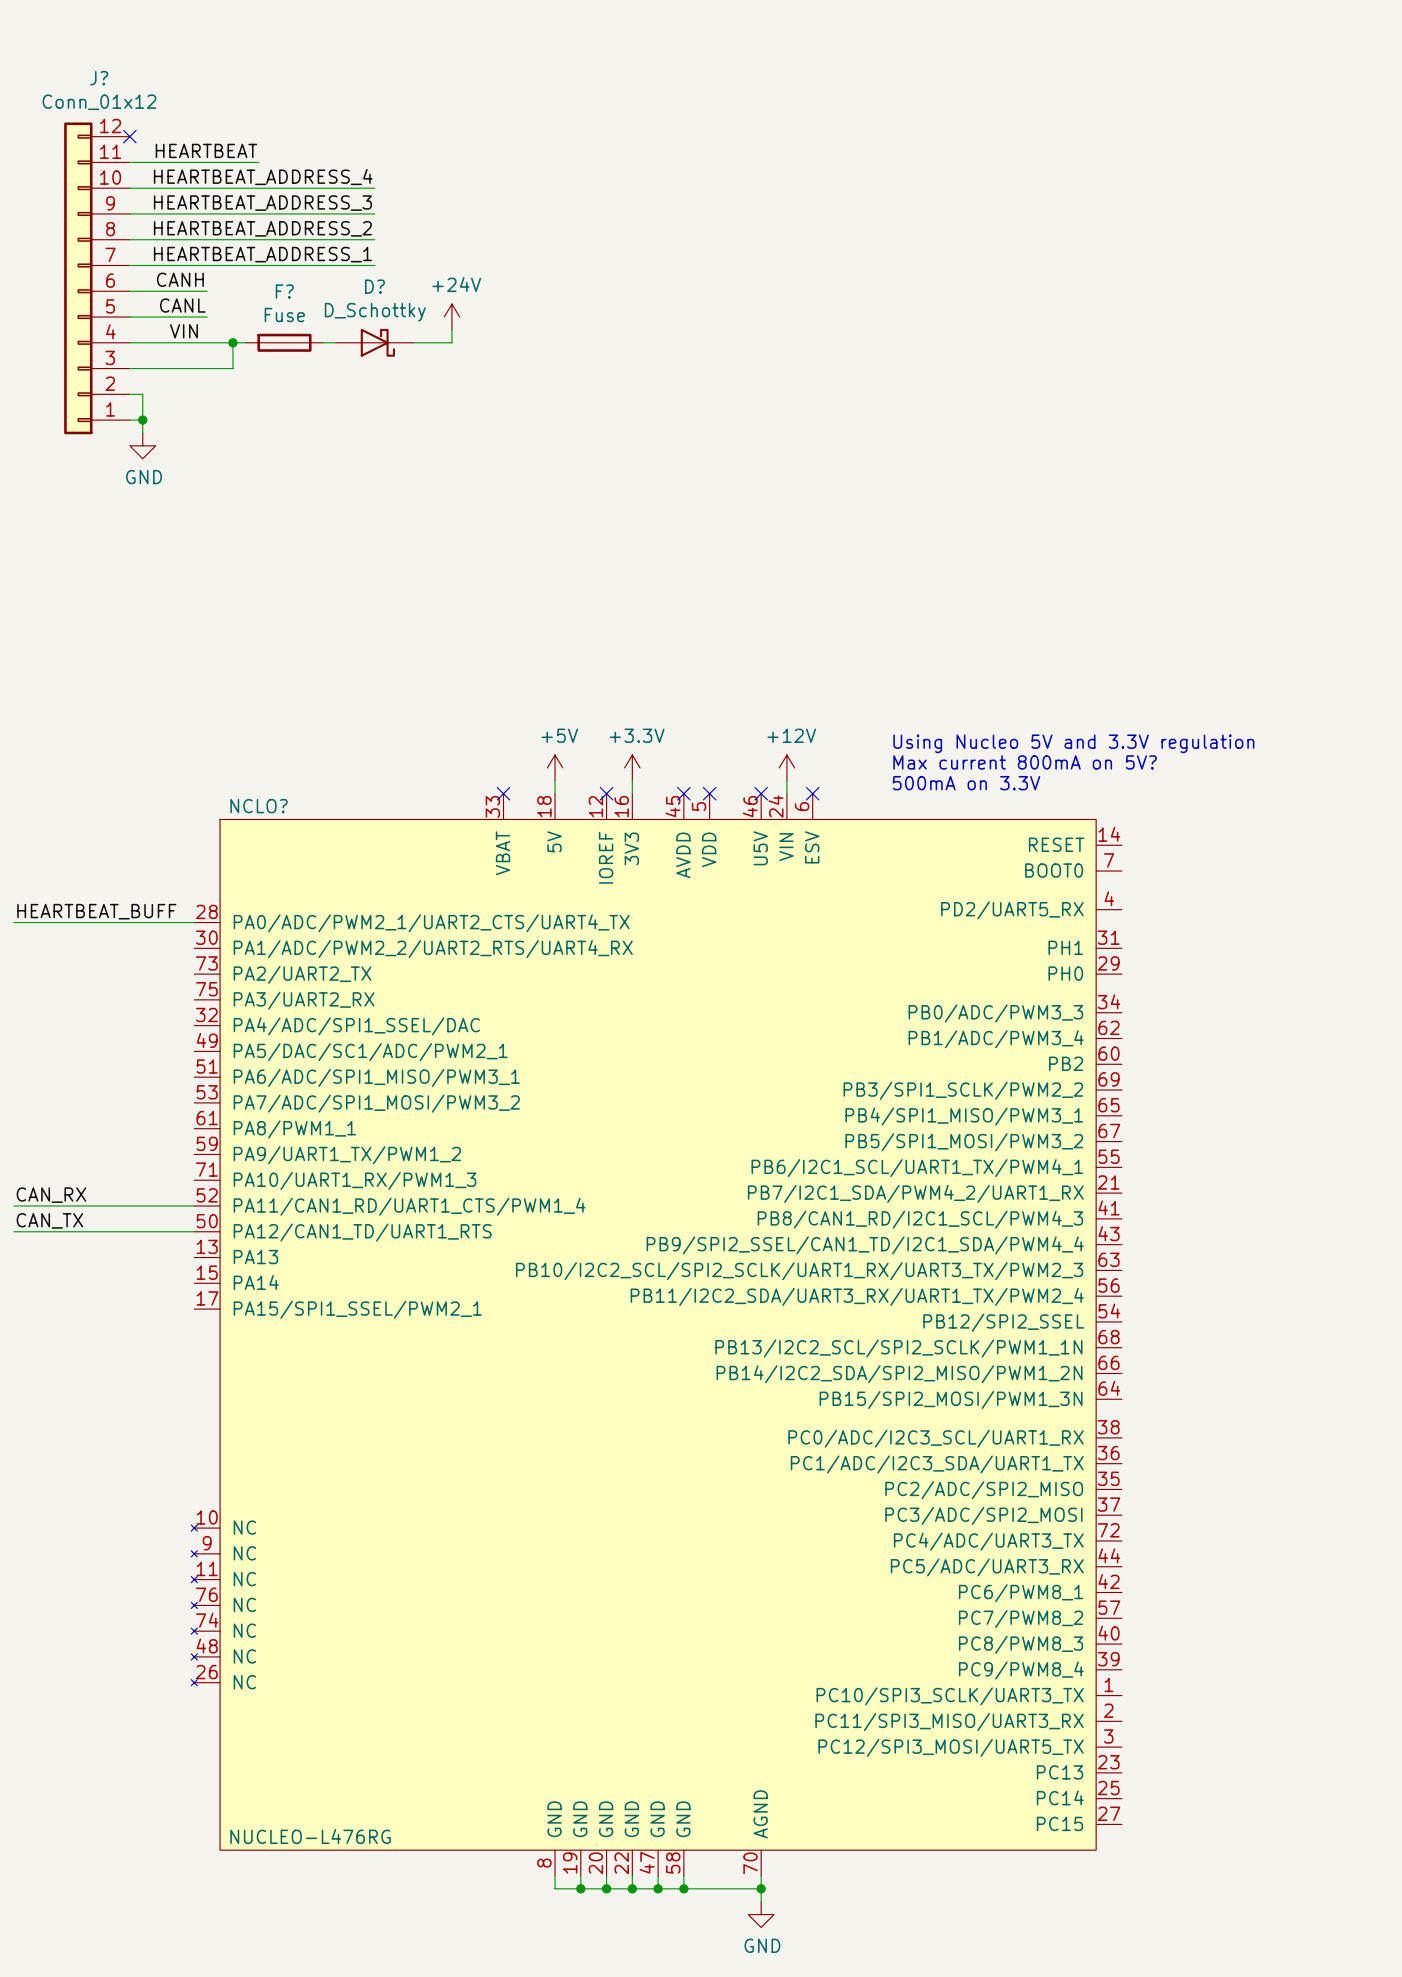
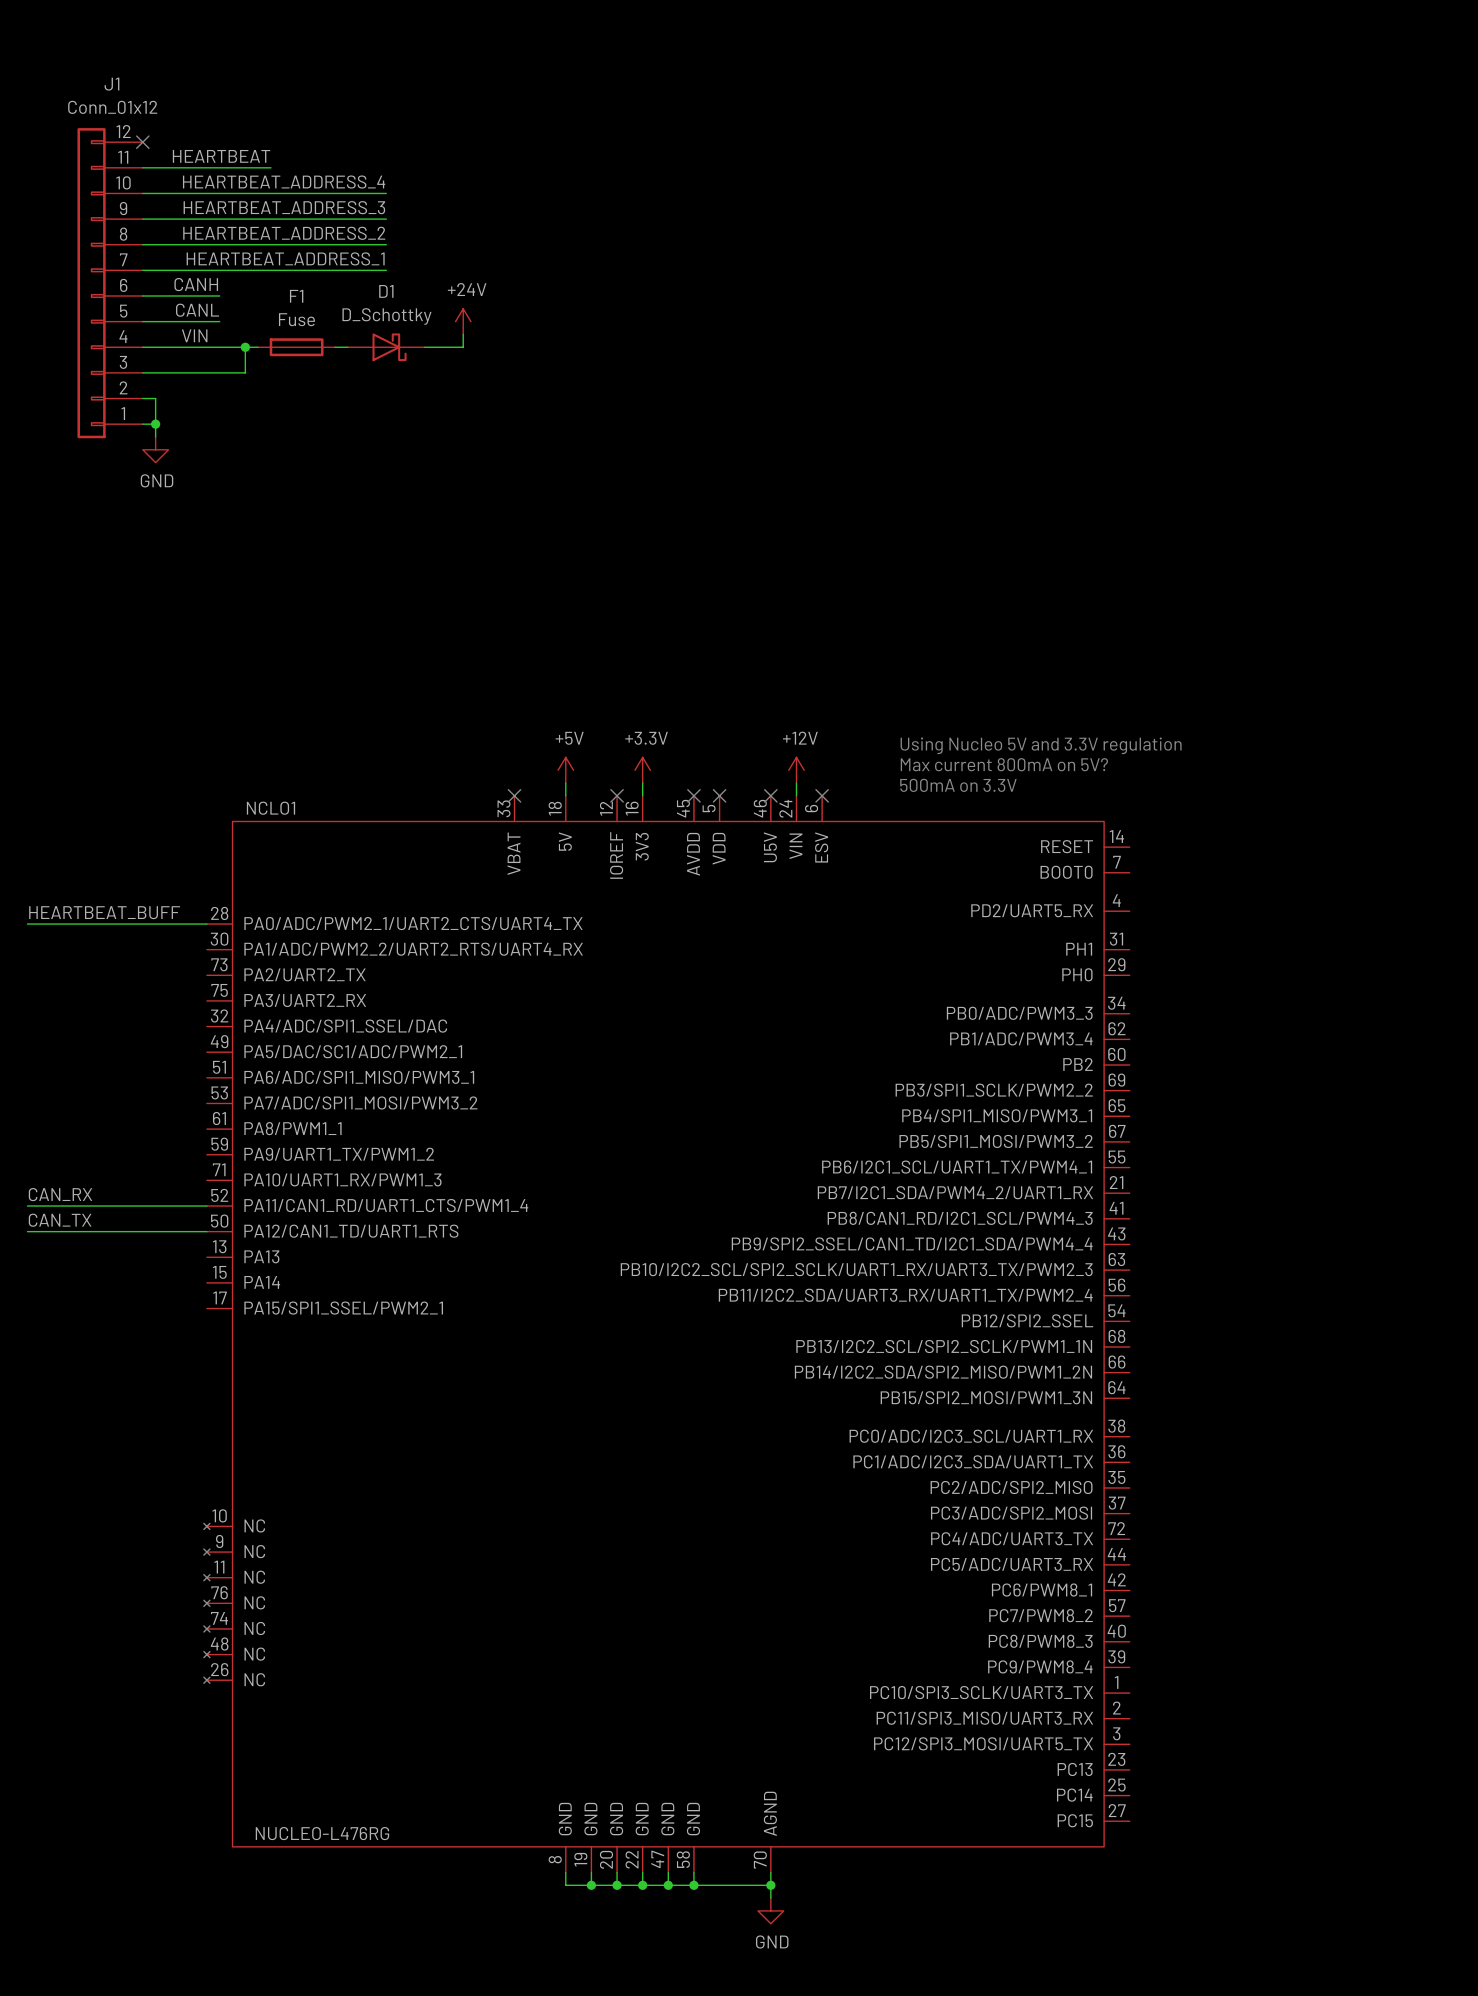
J? name: J? (99, 78) -> J1 (111, 84)
D? name: D? (374, 286) -> D1 (386, 291)
F? name: F? (284, 291) -> F1 (296, 296)
NCLO? name: NCLO? (259, 806) -> NCLO1 (270, 808)

